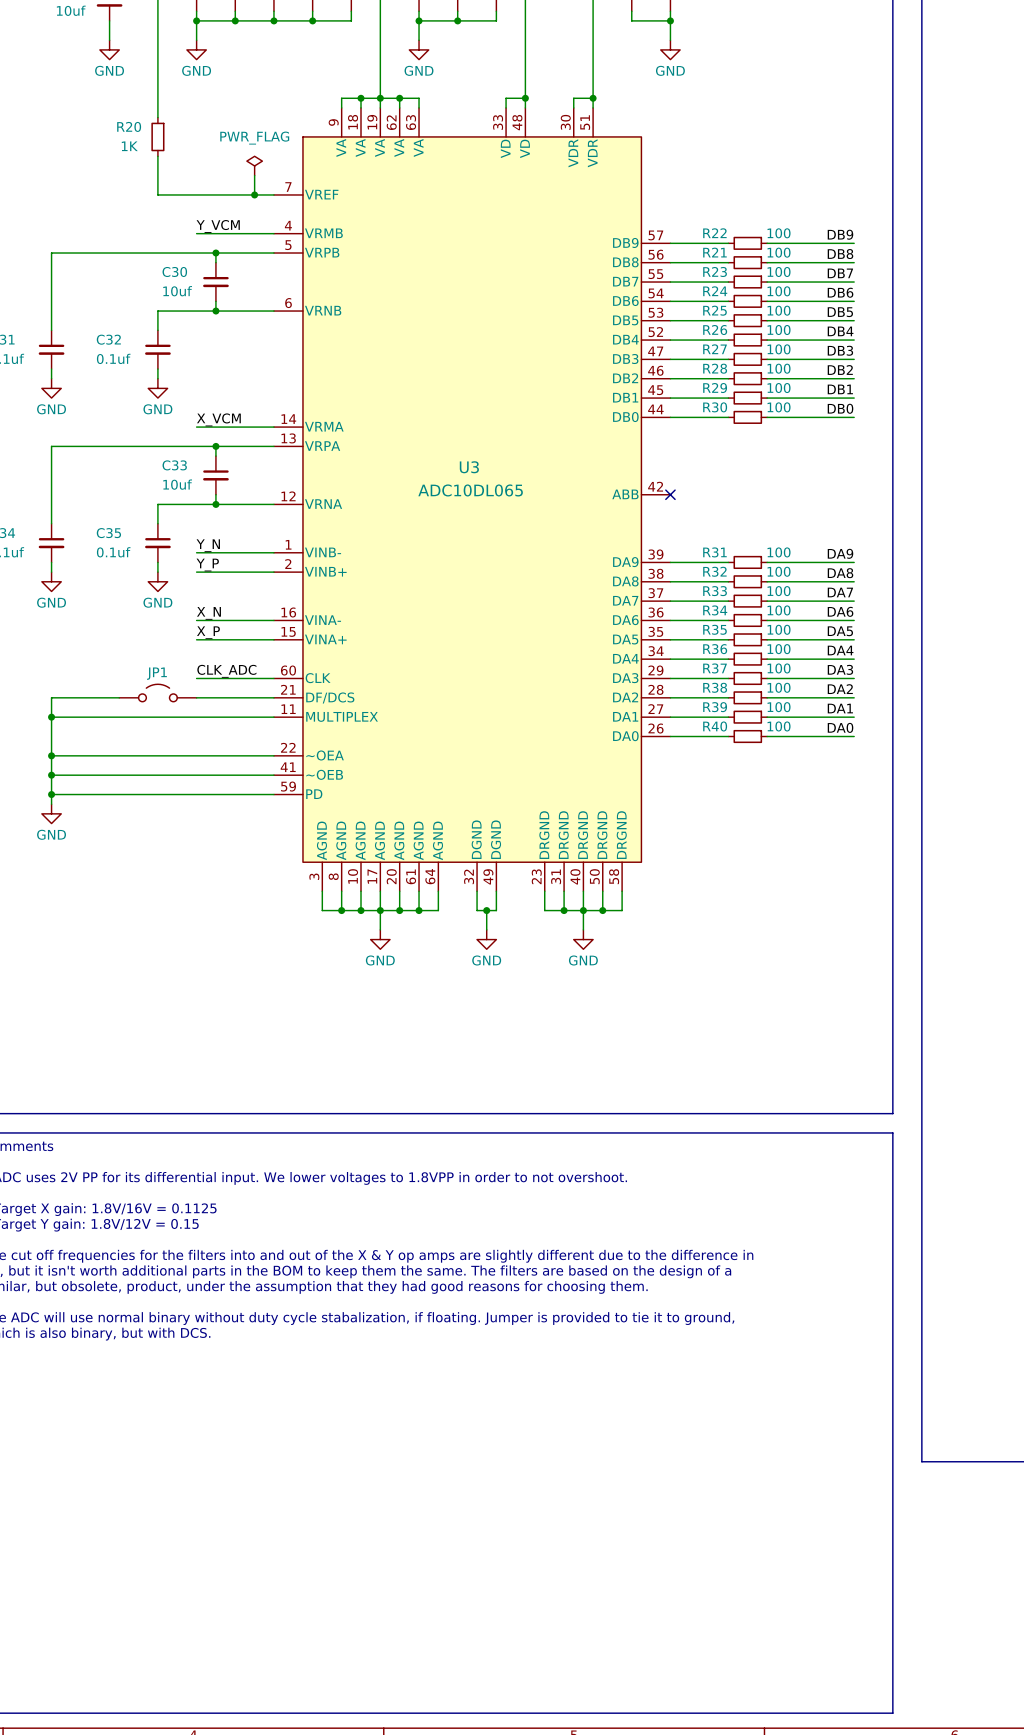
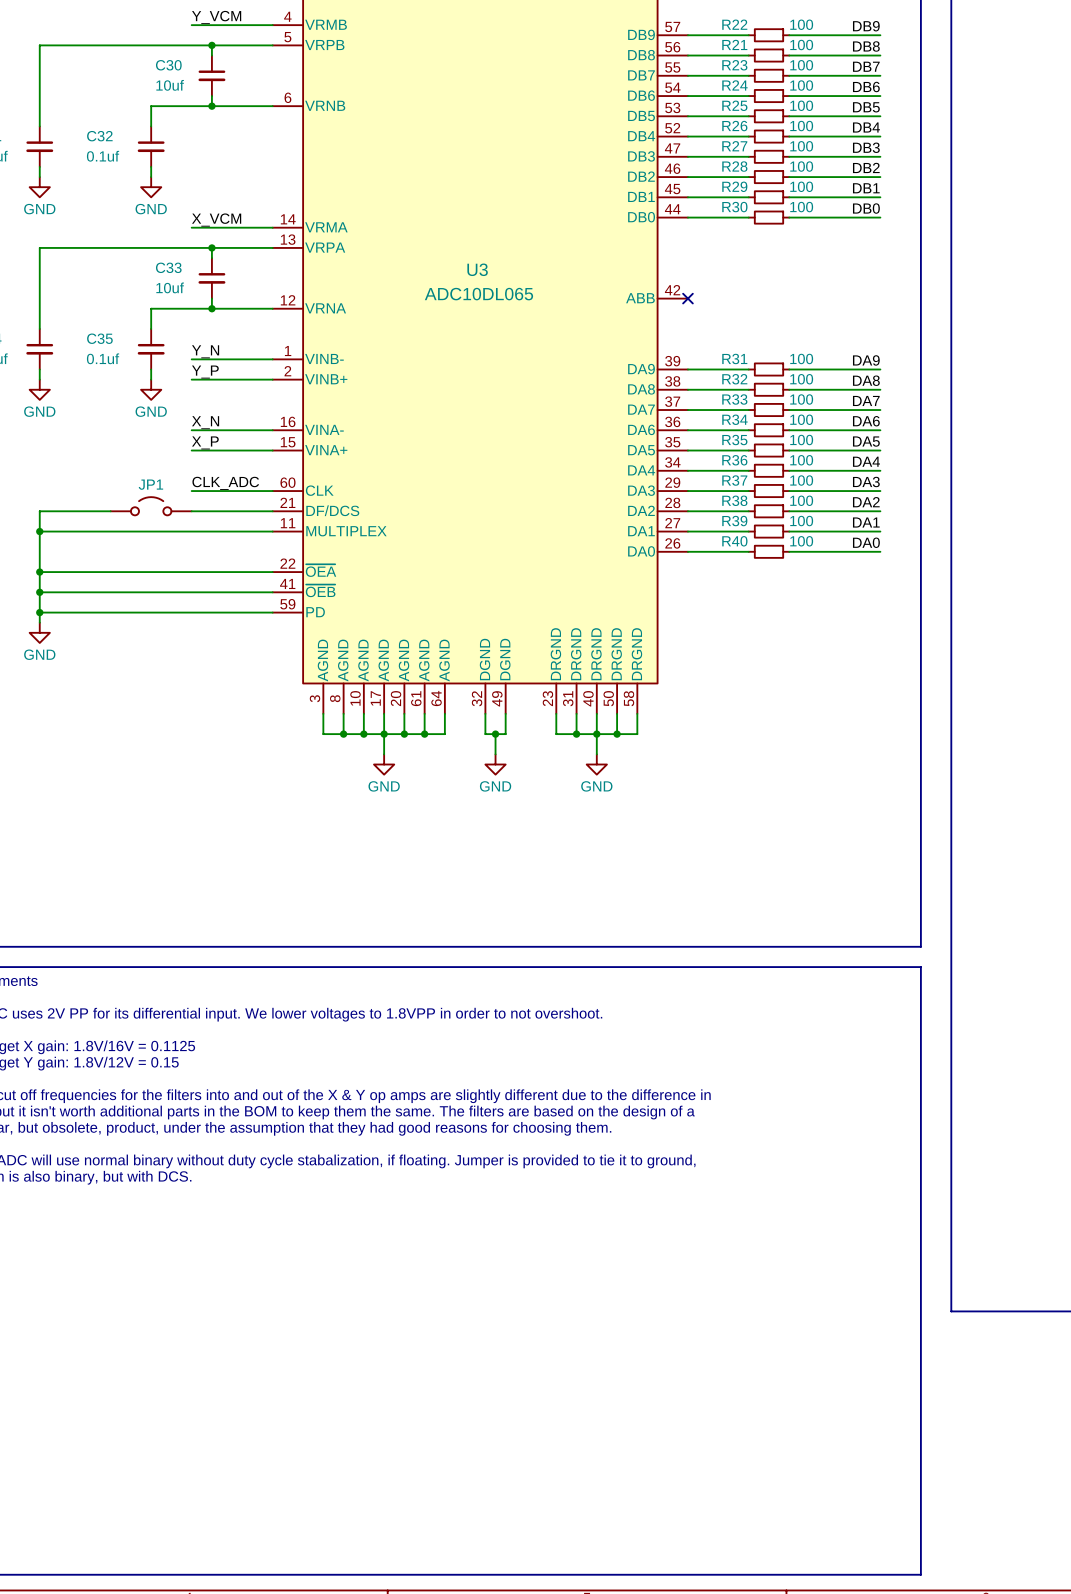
U3 pin name: ~OEA (325, 755) -> ~{OEA} (321, 570)
U3 pin name: ~OEB (324, 774) -> ~{OEB} (320, 590)

